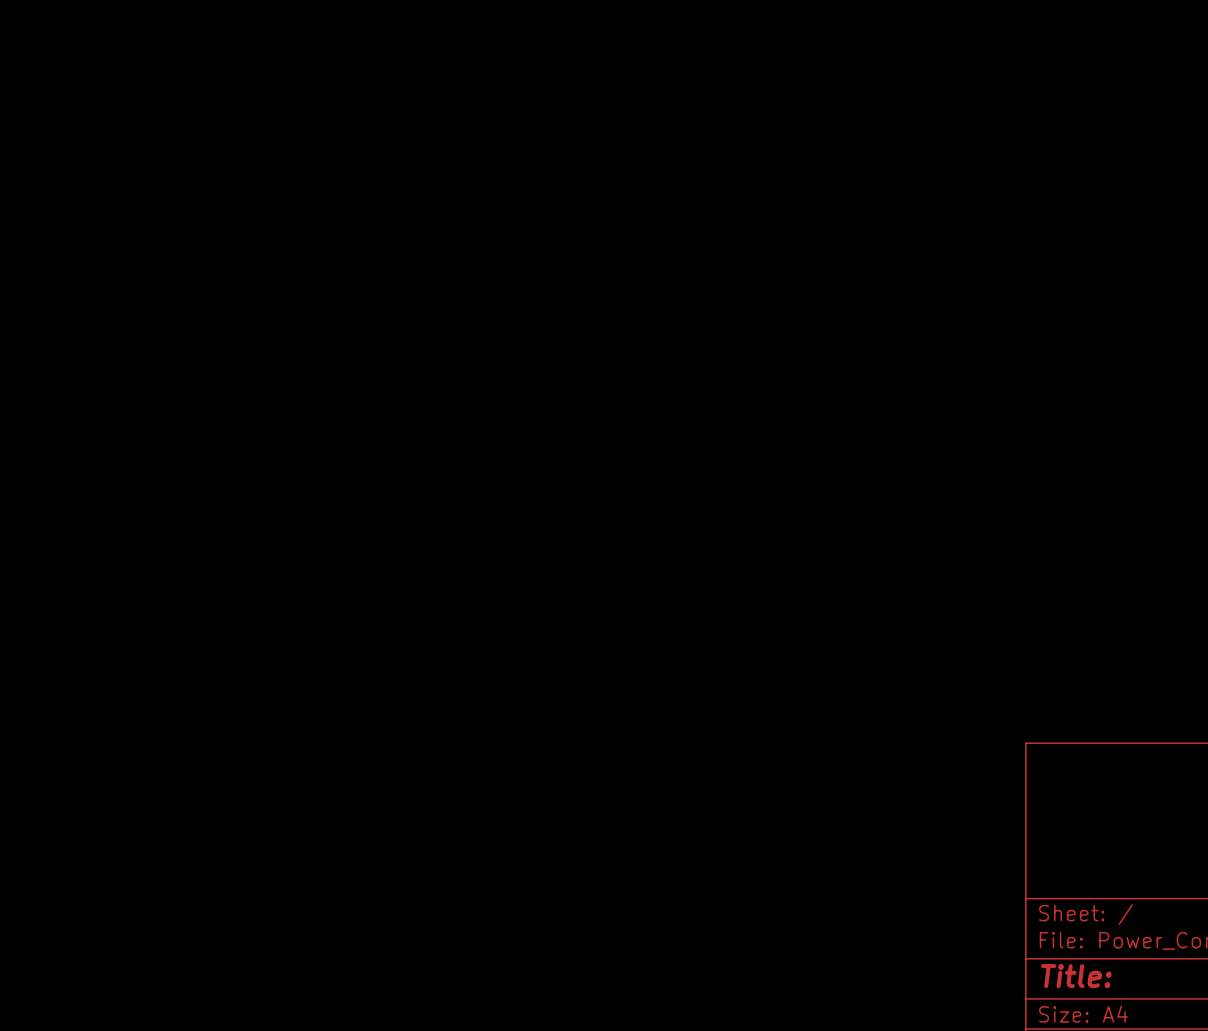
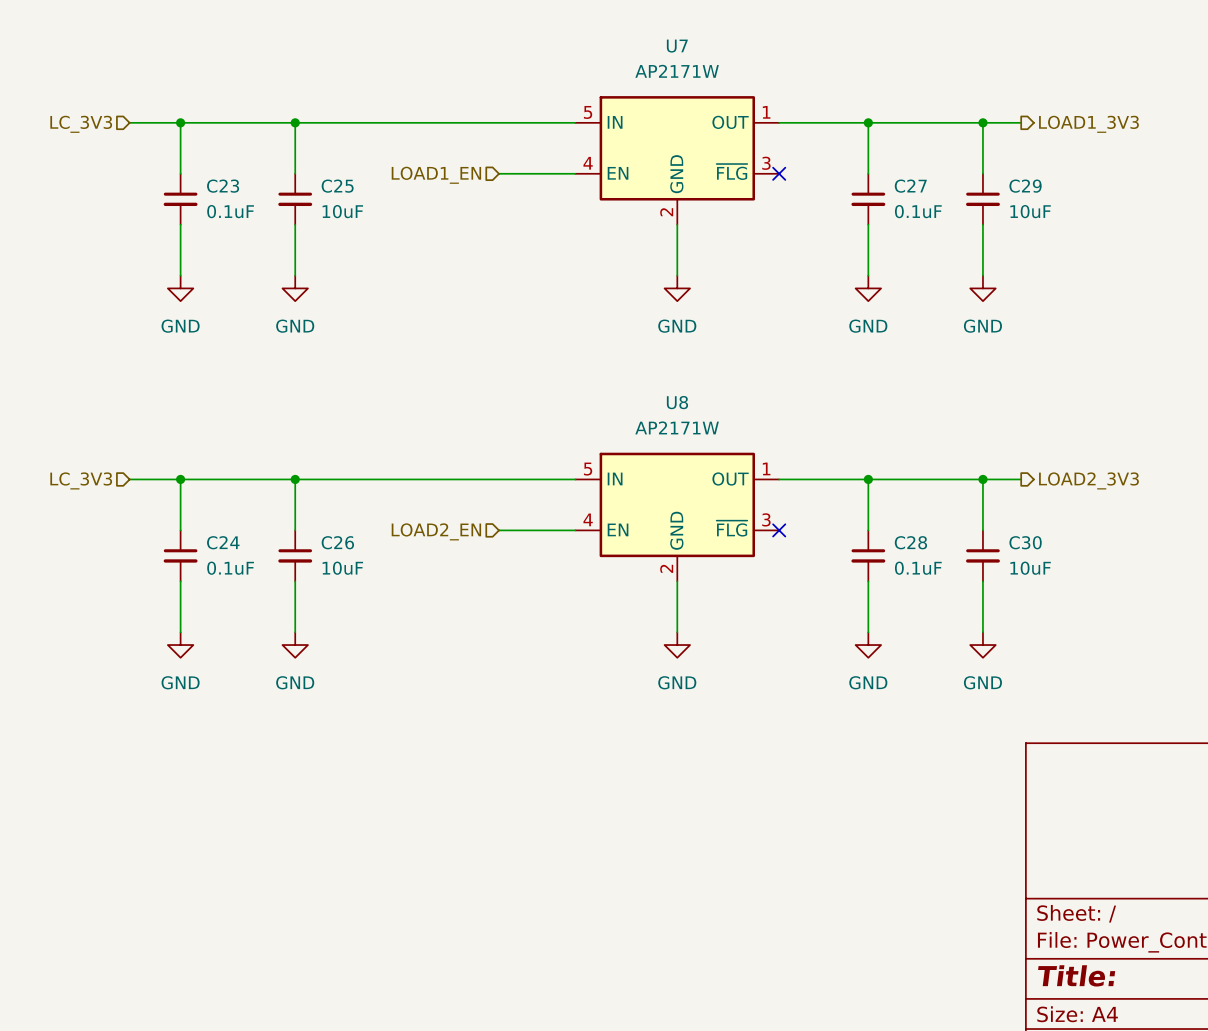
hierarchical label: none -> LC_3V3 (81, 124)
wire: none -> (129, 122) (575, 122)
wire: none -> (180, 122) (180, 173)
junction: none -> (180, 122)
wire: none -> (295, 122) (295, 173)
junction: none -> (295, 122)
wire: none -> (779, 122) (1021, 122)
wire: none -> (868, 122) (868, 173)
junction: none -> (868, 122)
wire: none -> (982, 122) (982, 173)
junction: none -> (982, 122)
hierarchical label: none -> LOAD1_3V3 (1088, 124)
U7: none -> AP2171W (677, 160)
hierarchical label: none -> LOAD1_EN (436, 175)
wire: none -> (499, 173) (575, 173)
no-connect mark: none -> (779, 173)
C23: none -> 0.1uF (180, 199)
C25: none -> 10uF (295, 199)
C27: none -> 0.1uF (868, 199)
C29: none -> 10uF (982, 199)
wire: none -> (180, 224) (180, 275)
wire: none -> (295, 224) (295, 275)
wire: none -> (677, 224) (677, 275)
wire: none -> (868, 224) (868, 275)
wire: none -> (982, 224) (982, 275)
power symbol: none -> GND (180, 288)
power symbol: none -> GND (295, 288)
power symbol: none -> GND (677, 288)
power symbol: none -> GND (868, 288)
power symbol: none -> GND (982, 288)
hierarchical label: none -> LC_3V3 (81, 480)
wire: none -> (129, 479) (575, 479)
wire: none -> (180, 479) (180, 530)
junction: none -> (180, 479)
wire: none -> (295, 479) (295, 530)
junction: none -> (295, 479)
wire: none -> (779, 479) (1021, 479)
wire: none -> (868, 479) (868, 530)
junction: none -> (868, 479)
wire: none -> (982, 479) (982, 530)
junction: none -> (982, 479)
hierarchical label: none -> LOAD2_3V3 (1088, 480)
U8: none -> AP2171W (677, 517)
hierarchical label: none -> LOAD2_EN (436, 531)
wire: none -> (499, 530) (575, 530)
no-connect mark: none -> (779, 530)
C24: none -> 0.1uF (180, 555)
C26: none -> 10uF (295, 555)
C28: none -> 0.1uF (868, 555)
C30: none -> 10uF (982, 555)
wire: none -> (180, 581) (180, 632)
wire: none -> (295, 581) (295, 632)
wire: none -> (677, 581) (677, 632)
wire: none -> (868, 581) (868, 632)
wire: none -> (982, 581) (982, 632)
power symbol: none -> GND (180, 645)
power symbol: none -> GND (295, 645)
power symbol: none -> GND (677, 645)
power symbol: none -> GND (868, 645)
power symbol: none -> GND (982, 645)

